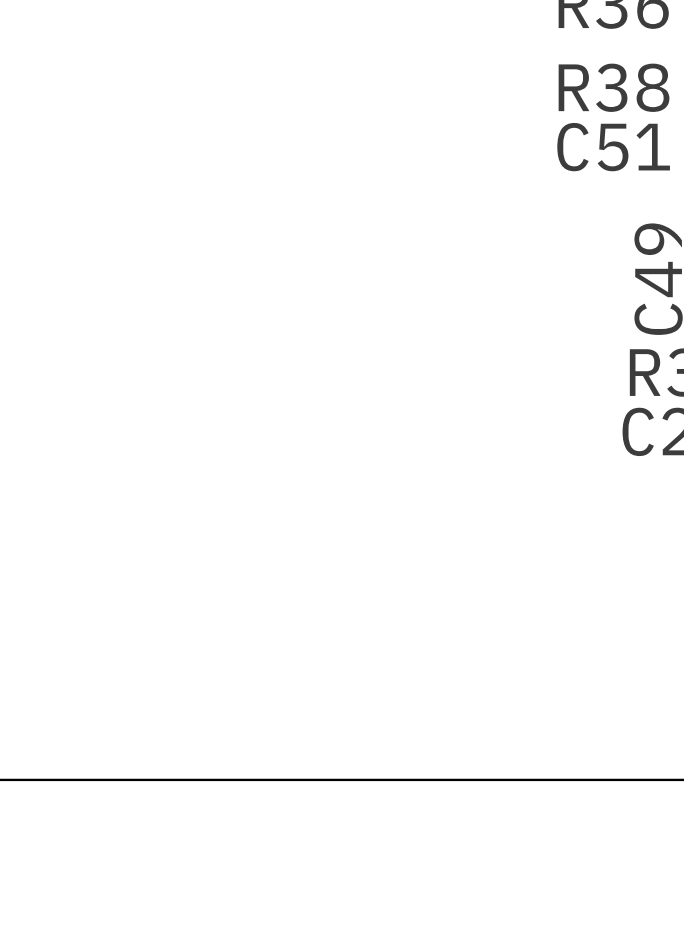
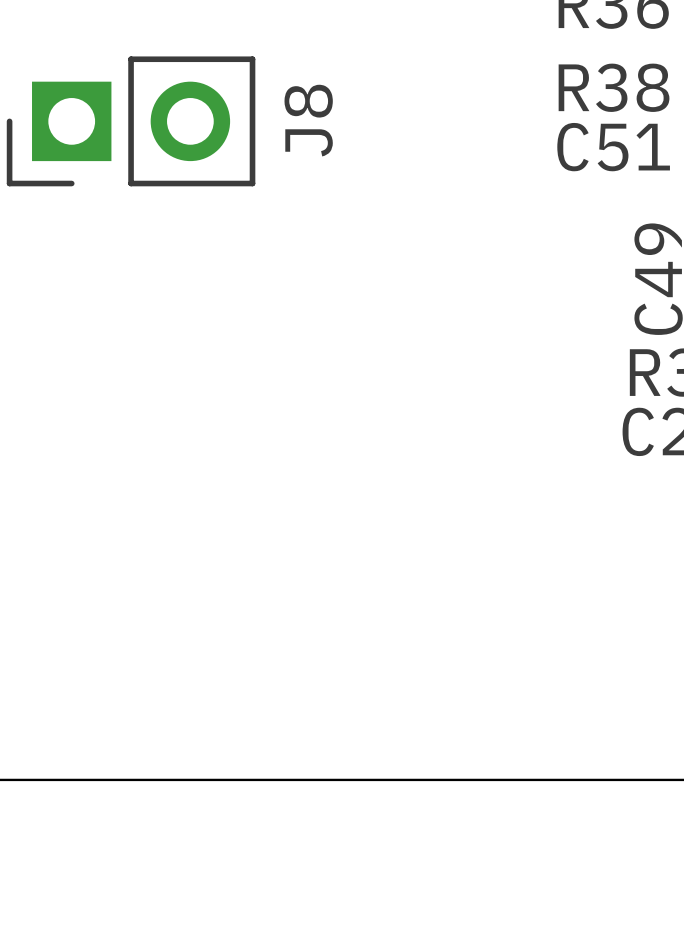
J8: none -> (131, 121)

